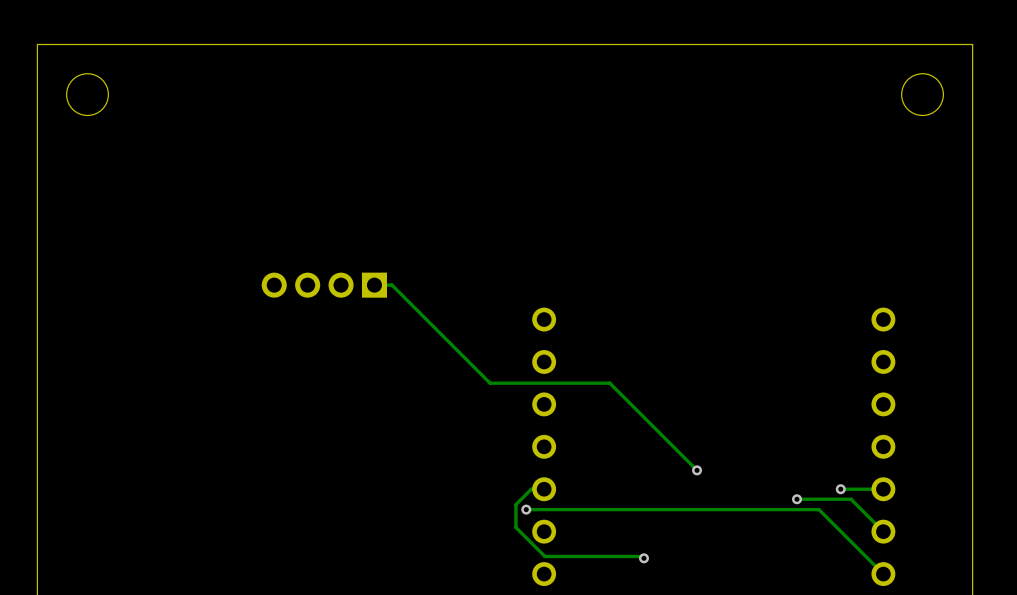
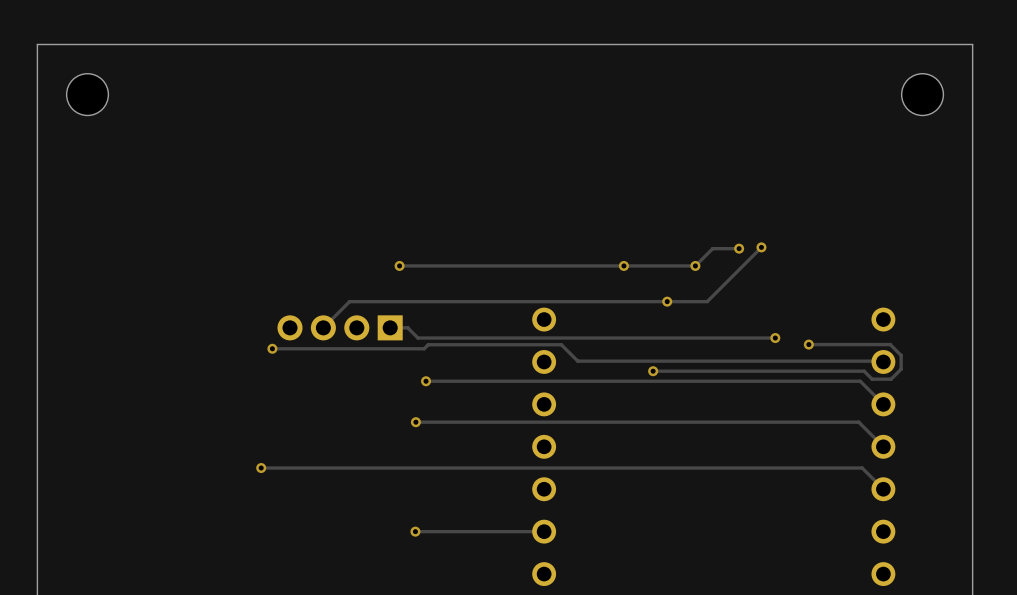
track: none -> (761, 247) (707, 301) (349, 301) (323, 327)
via: none -> (761, 247)
track: none -> (739, 248) (712, 248) (695, 265) (399, 265)
via: none -> (739, 248)
via: none -> (399, 265)
via: none -> (623, 265)
via: none -> (695, 265)
part position: (324, 285) -> (340, 327)
track: (374, 285) (392, 285) (490, 383) (609, 383) (697, 470) -> none
via: none -> (667, 301)
track: none -> (390, 327) (407, 327) (417, 338) (775, 338)
via: none -> (775, 338)
track: none -> (808, 344) (890, 344) (901, 355) (901, 369) (891, 379) (872, 379) (864, 371) (653, 371)
via: none -> (808, 344)
track: none -> (272, 348) (424, 348) (428, 344) (561, 344) (577, 361) (883, 361)
via: none -> (272, 348)
via: none -> (653, 371)
track: none -> (426, 381) (860, 381) (883, 404)
via: none -> (426, 381)
track: none -> (415, 422) (858, 422) (883, 446)
via: none -> (415, 422)
via: none -> (261, 468)
via: (697, 470) -> none
track: (544, 489) (531, 489) (515, 504) (515, 527) (544, 556) (642, 556) (643, 558) -> none
via: (840, 489) -> none
track: (883, 489) (840, 489) -> (883, 489) (862, 468) (261, 468)
track: (797, 499) (851, 499) (883, 531) -> none
via: (797, 499) -> none
track: (526, 509) (818, 509) (883, 574) -> none
via: (526, 509) -> none
via: none -> (415, 531)
track: none -> (544, 531) (415, 531)
via: (643, 558) -> none

